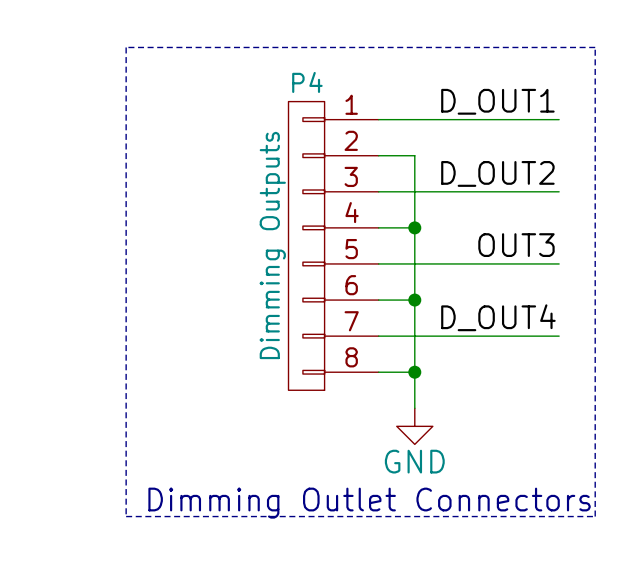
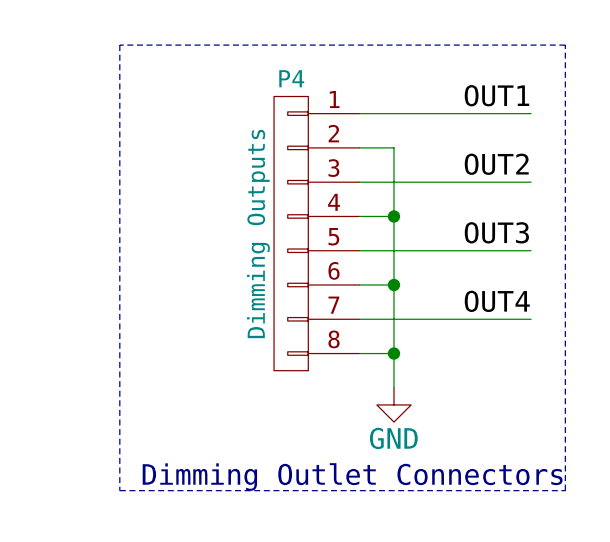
label: D_OUT1 (497, 101) -> OUT1 (496, 95)
label: D_OUT2 (497, 173) -> OUT2 (496, 164)
label: D_OUT4 (498, 317) -> OUT4 (497, 301)

